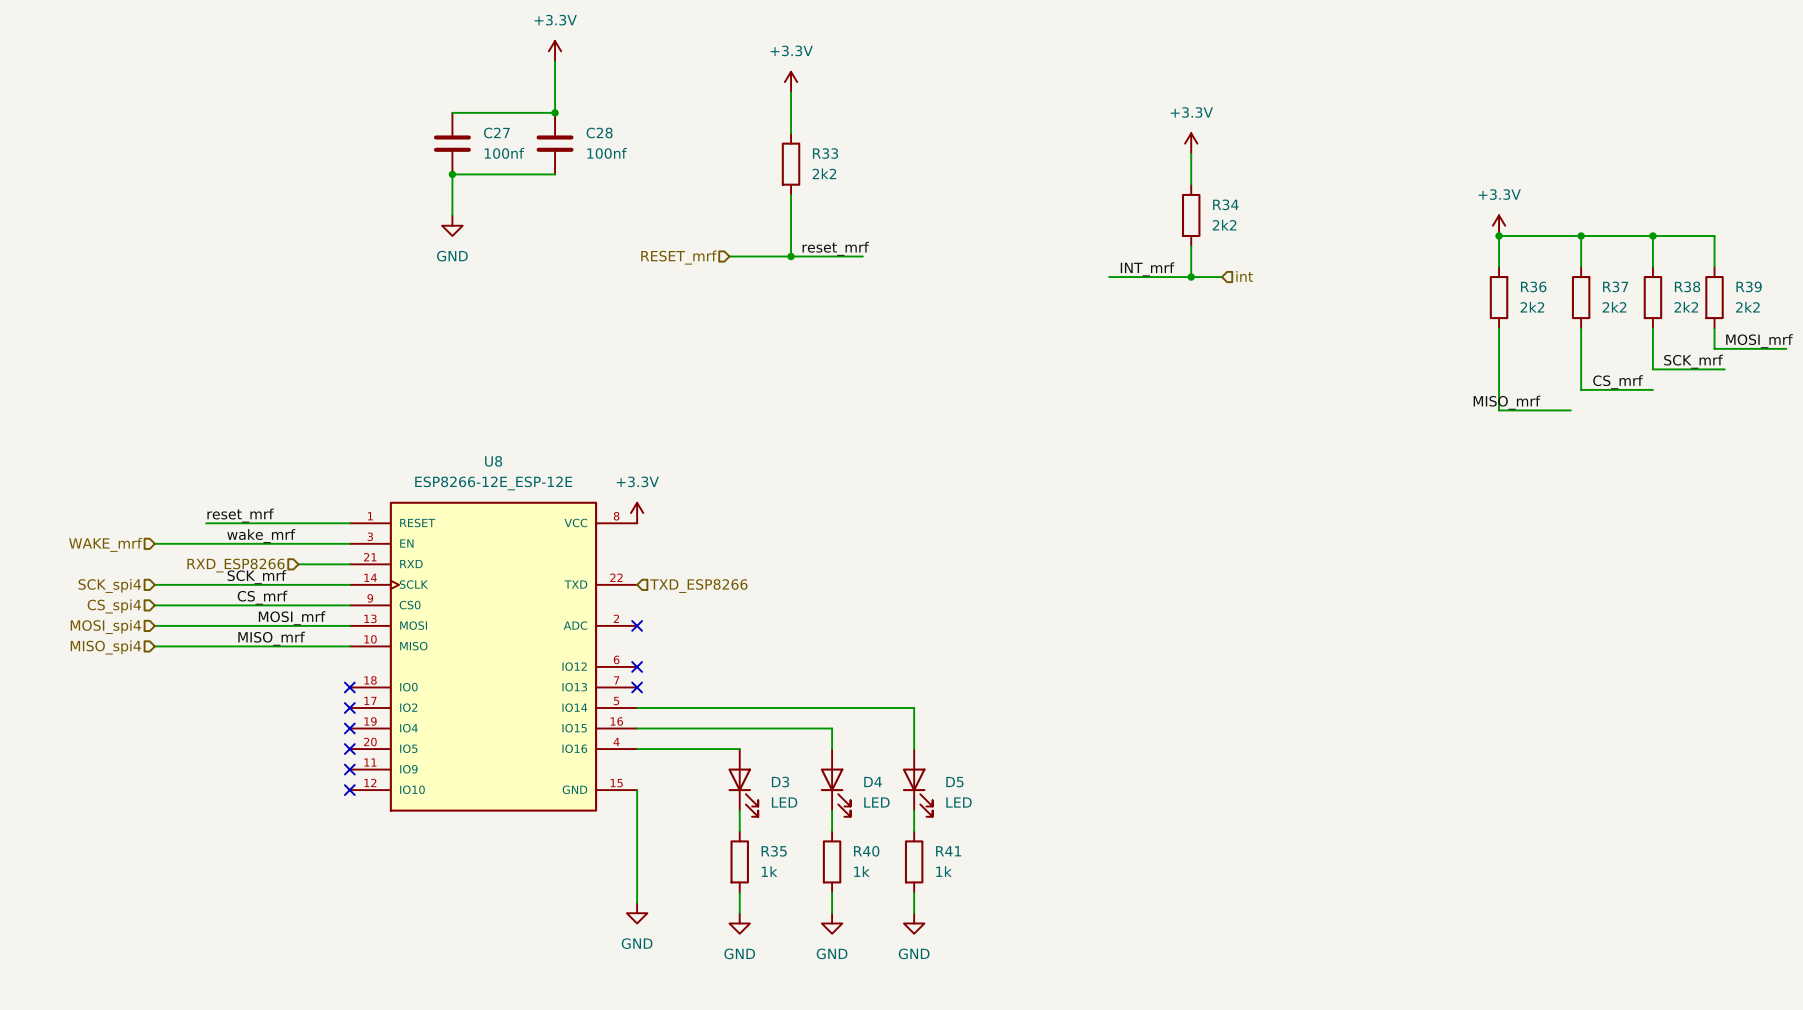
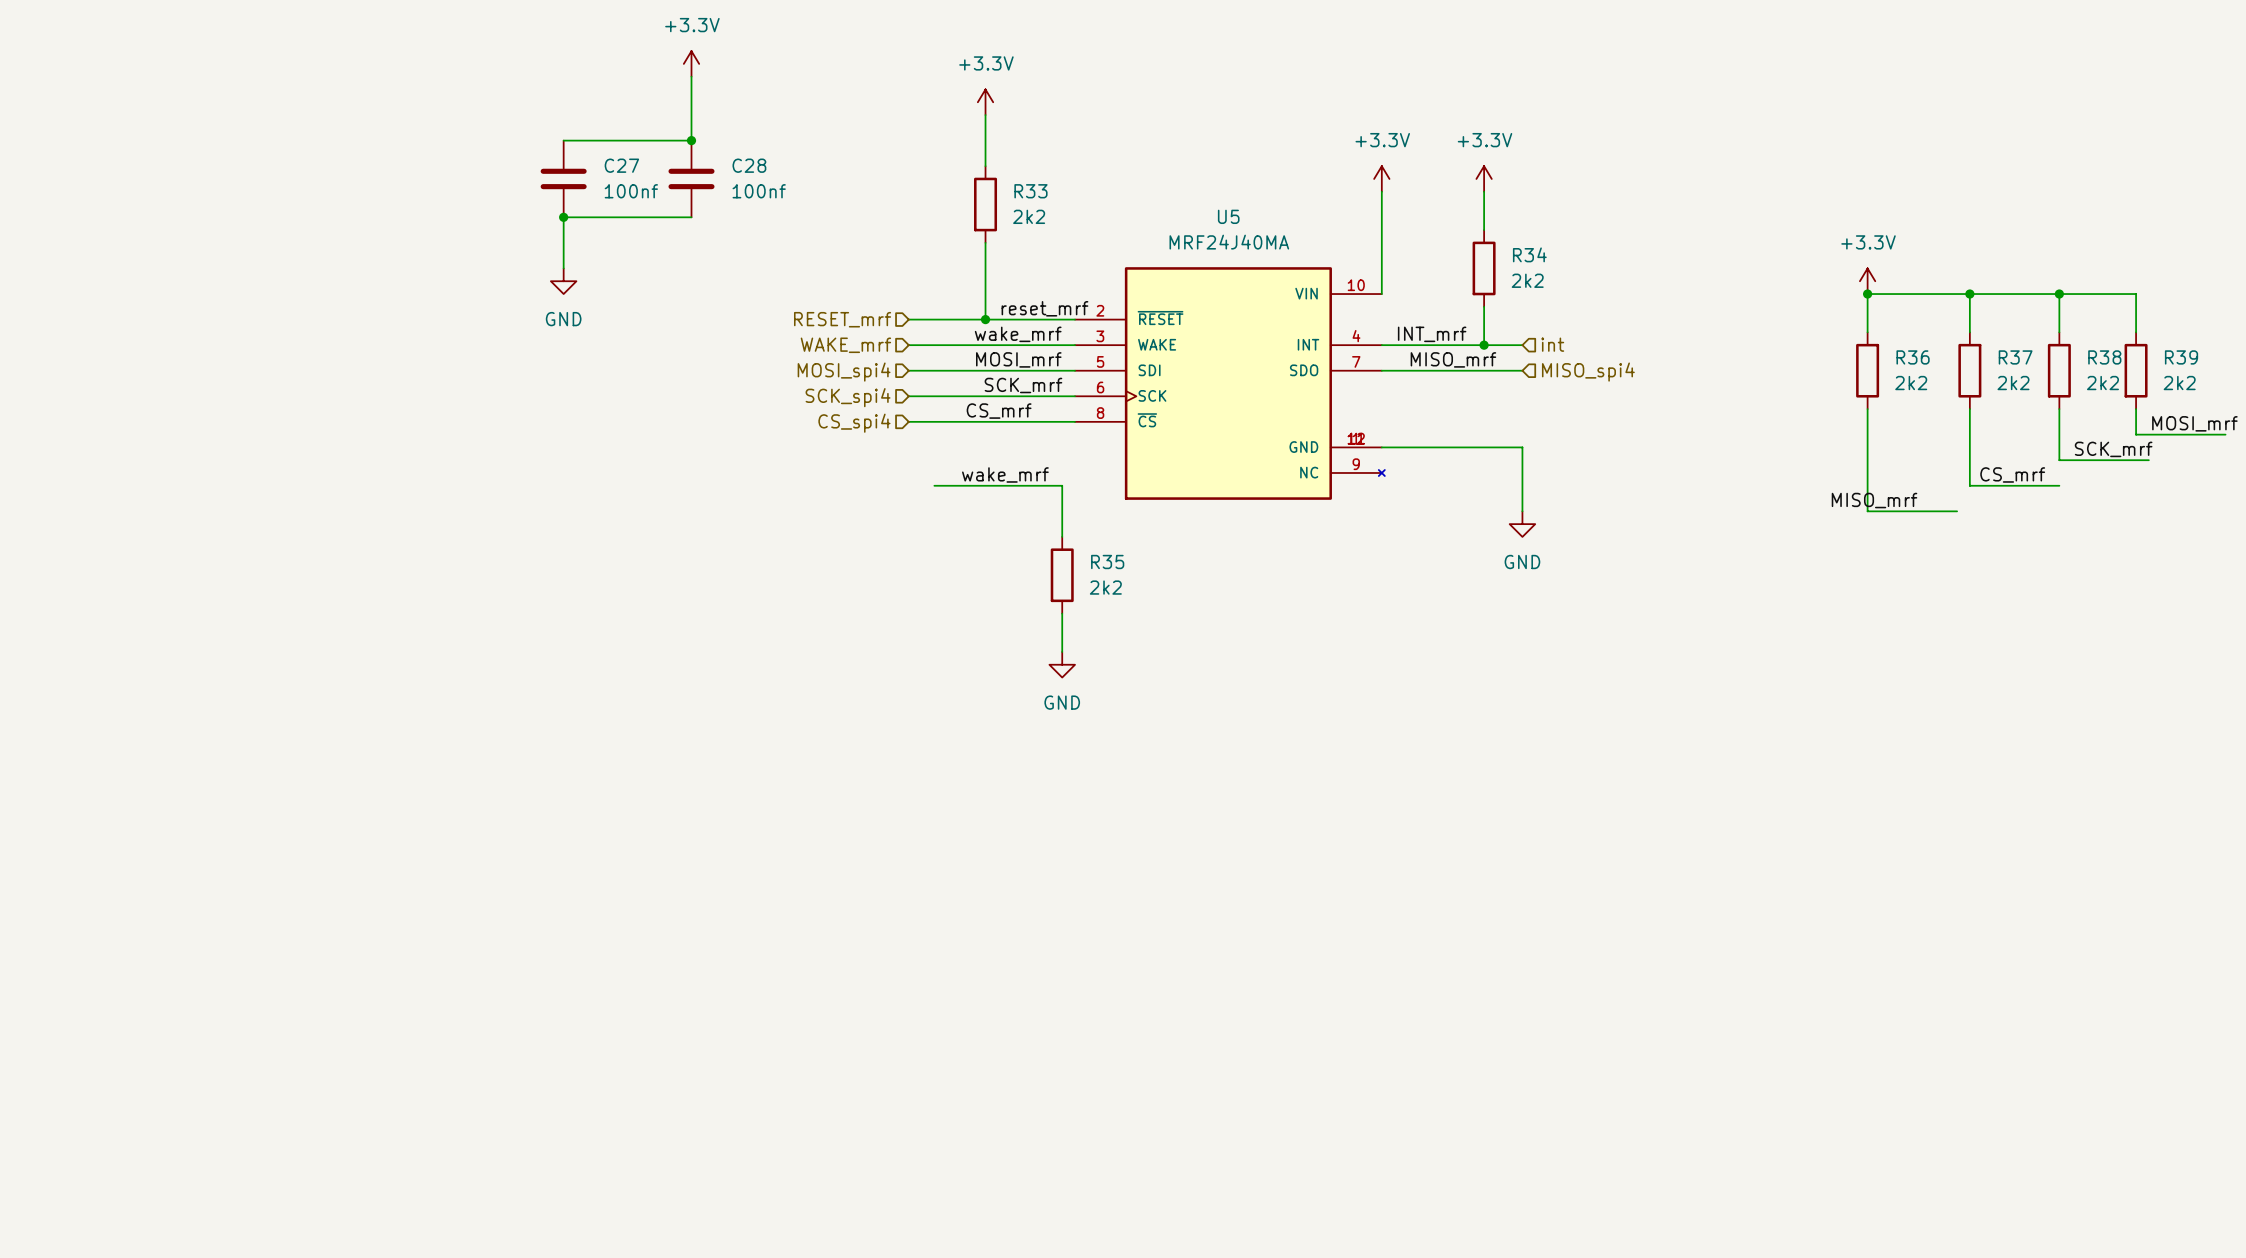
power symbol: none -> +3.3V (1381, 178)
wire: none -> (1381, 191) (1381, 294)
label: none -> wake_mrf (1018, 334)
wire: none -> (908, 345) (1075, 345)
hierarchical label: none -> WAKE_mrf (845, 345)
label: none -> MOSI_mrf (1018, 359)
label: none -> MISO_mrf (1453, 359)
wire: none -> (908, 370) (1075, 370)
wire: none -> (1381, 370) (1522, 370)
hierarchical label: none -> MOSI_spi4 (844, 372)
hierarchical label: none -> MISO_spi4 (1588, 372)
U5: none -> MRF24J40MA (1229, 383)
label: none -> SCK_mrf (1023, 385)
wire: none -> (908, 396) (1075, 396)
hierarchical label: none -> SCK_spi4 (848, 397)
label: none -> CS_mrf (999, 411)
wire: none -> (908, 421) (1075, 421)
hierarchical label: none -> CS_spi4 (854, 423)
wire: none -> (1381, 447) (1522, 447) (1522, 511)
label: none -> wake_mrf (1005, 474)
wire: none -> (934, 485) (1062, 485) (1062, 536)
power symbol: none -> GND (1522, 524)
wire: none -> (1062, 613) (1062, 651)
power symbol: +3.3V (637, 513) -> none
label: reset_mrf (240, 515) -> none
wire: (206, 523) (349, 523) -> none
power symbol: none -> GND (1062, 664)
label: wake_mrf (261, 536) -> none
wire: (154, 543) (349, 543) -> none
hierarchical label: WAKE_mrf (105, 544) -> none
wire: (298, 564) (349, 564) -> none
hierarchical label: RXD_ESP8266 (236, 565) -> none
label: SCK_mrf (257, 577) -> none
wire: (154, 584) (349, 584) -> none
hierarchical label: SCK_spi4 (109, 585) -> none
hierarchical label: TXD_ESP8266 (698, 586) -> none
label: CS_mrf (262, 597) -> none
wire: (154, 605) (349, 605) -> none
hierarchical label: CS_spi4 (114, 606) -> none
label: MOSI_mrf (292, 618) -> none
wire: (154, 625) (349, 625) -> none
no-connect mark: (637, 625) -> none
hierarchical label: MOSI_spi4 (105, 626) -> none
label: MISO_mrf (271, 638) -> none
wire: (154, 646) (349, 646) -> none
hierarchical label: MISO_spi4 (105, 647) -> none
U8: ESP8266-12E_ESP-12E (493, 656) -> none
no-connect mark: (637, 666) -> none
no-connect mark: (349, 687) -> none
no-connect mark: (637, 687) -> none
no-connect mark: (349, 708) -> none
wire: (637, 708) (914, 708) (914, 749) -> none
no-connect mark: (349, 728) -> none
wire: (637, 728) (832, 728) (832, 749) -> none
no-connect mark: (349, 749) -> none
wire: (637, 749) (739, 749) -> none
no-connect mark: (349, 769) -> none
D3: LED (743, 782) -> none
D4: LED (835, 782) -> none
D5: LED (917, 782) -> none
no-connect mark: (349, 790) -> none
wire: (637, 790) (637, 902) -> none
wire: (739, 810) (739, 831) -> none
wire: (832, 810) (832, 831) -> none
wire: (914, 810) (914, 831) -> none
R35 position: (739, 861) -> (1062, 575)
R40: 1k (832, 861) -> none
R41: 1k (914, 861) -> none
R35 value: 1k (769, 871) -> 2k2 (1105, 587)
wire: (739, 892) (739, 913) -> none
wire: (832, 892) (832, 913) -> none
wire: (914, 892) (914, 913) -> none
power symbol: GND (637, 913) -> none
power symbol: GND (739, 923) -> none
power symbol: GND (832, 923) -> none
power symbol: GND (914, 923) -> none

